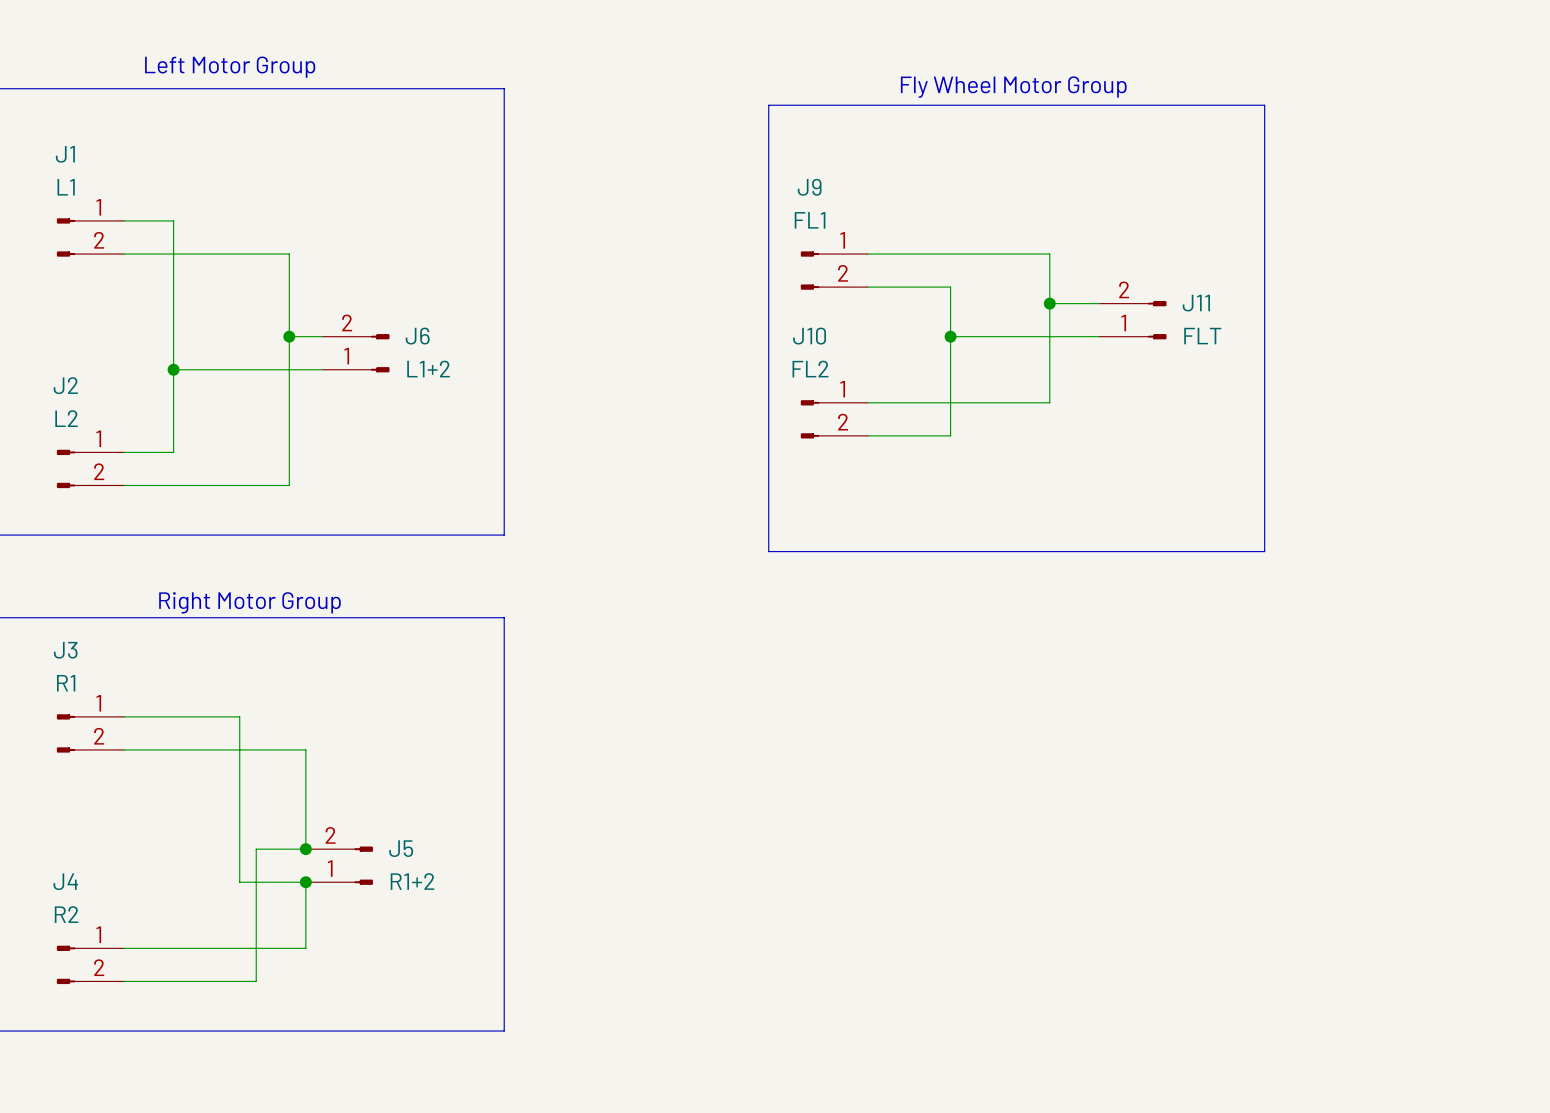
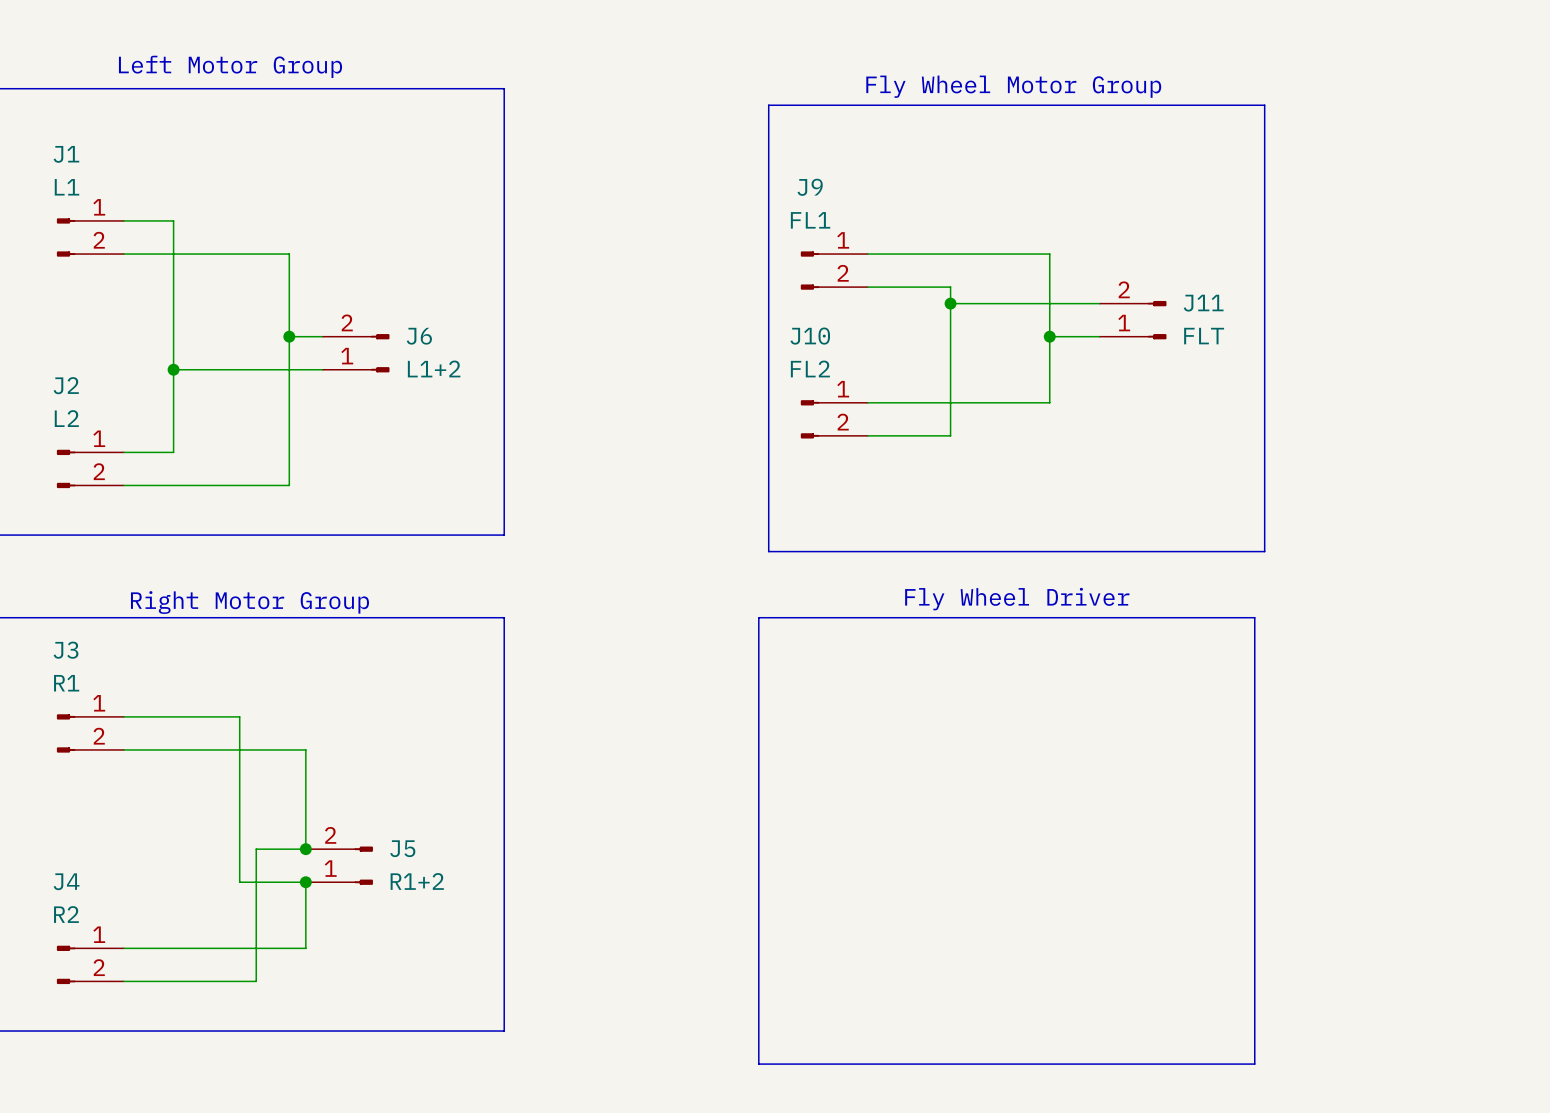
junction position: (1049, 303) -> (1049, 336)
wire: (950, 336) (1049, 336) -> (950, 303) (1049, 303)
junction position: (950, 336) -> (950, 303)
text: none -> Fly Wheel Driver (1017, 599)
line: none -> (758, 617) (1254, 617) (1254, 1064) (758, 1064) (758, 617)

